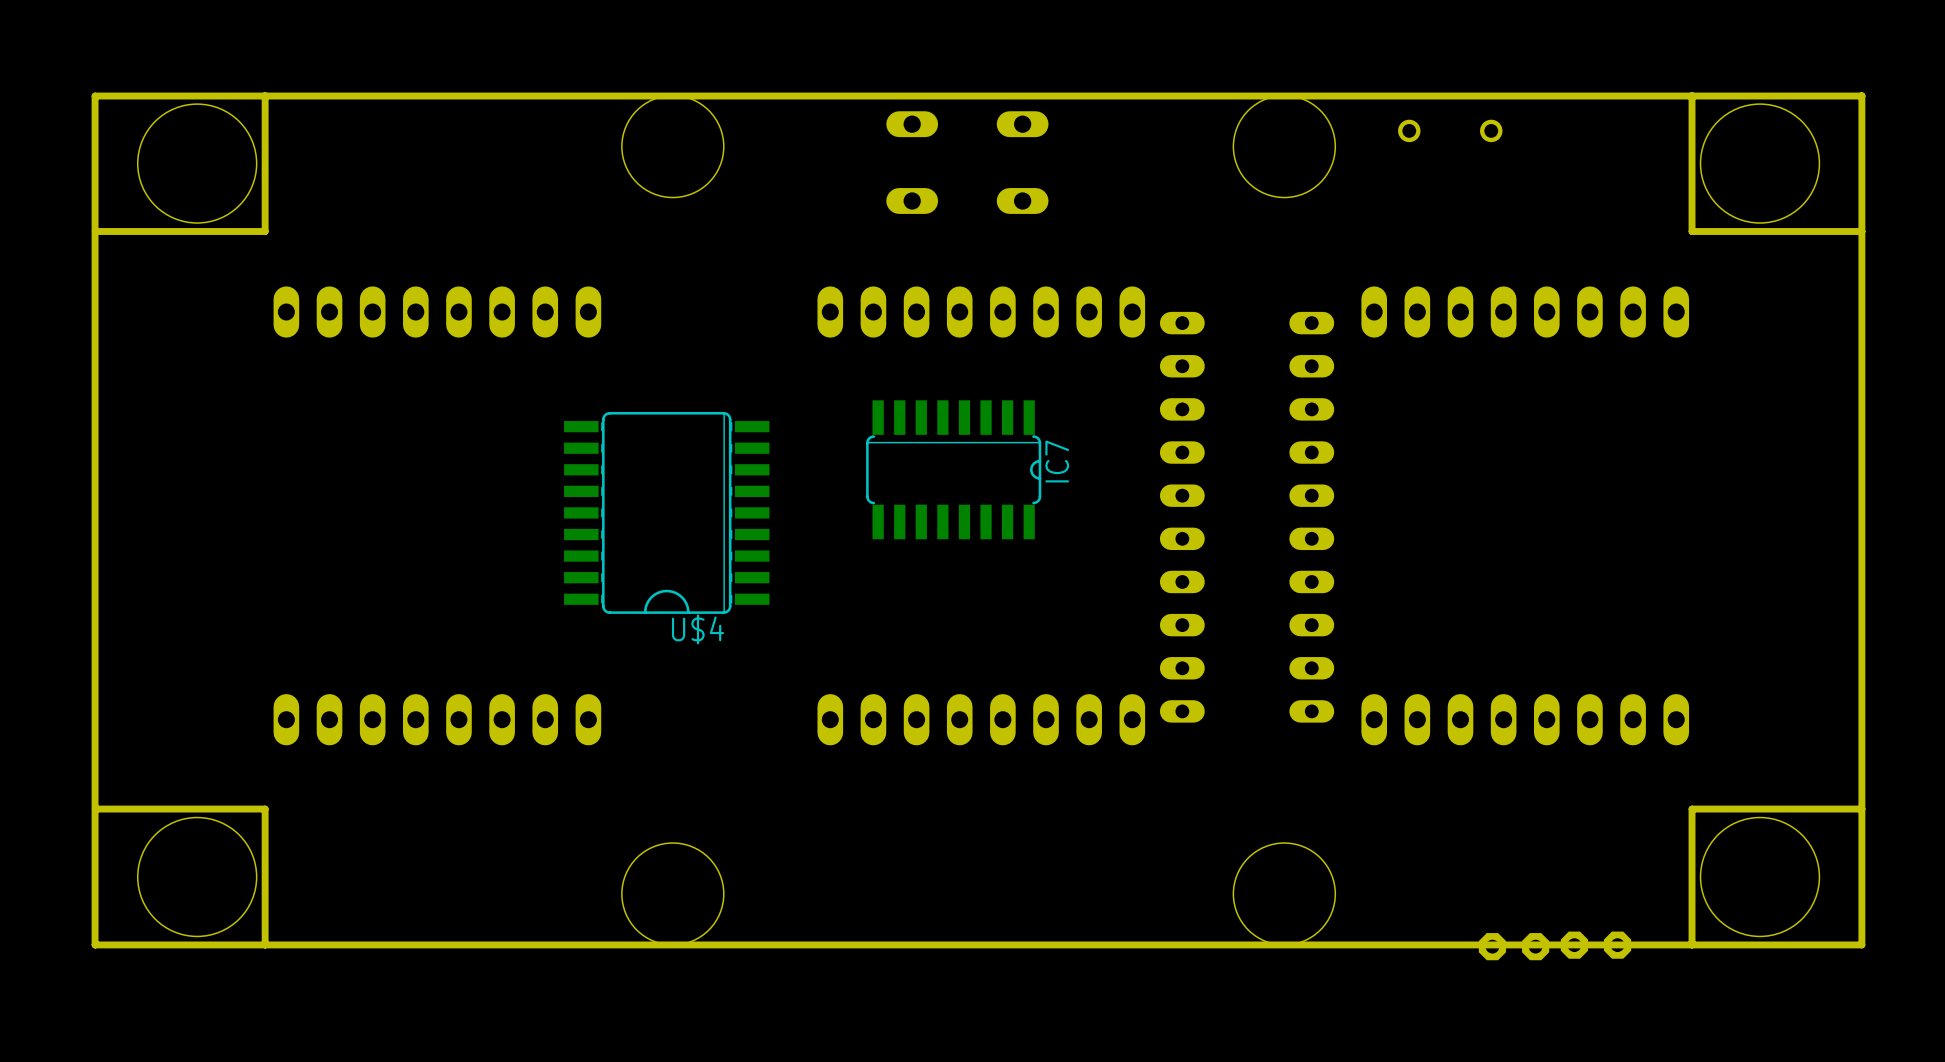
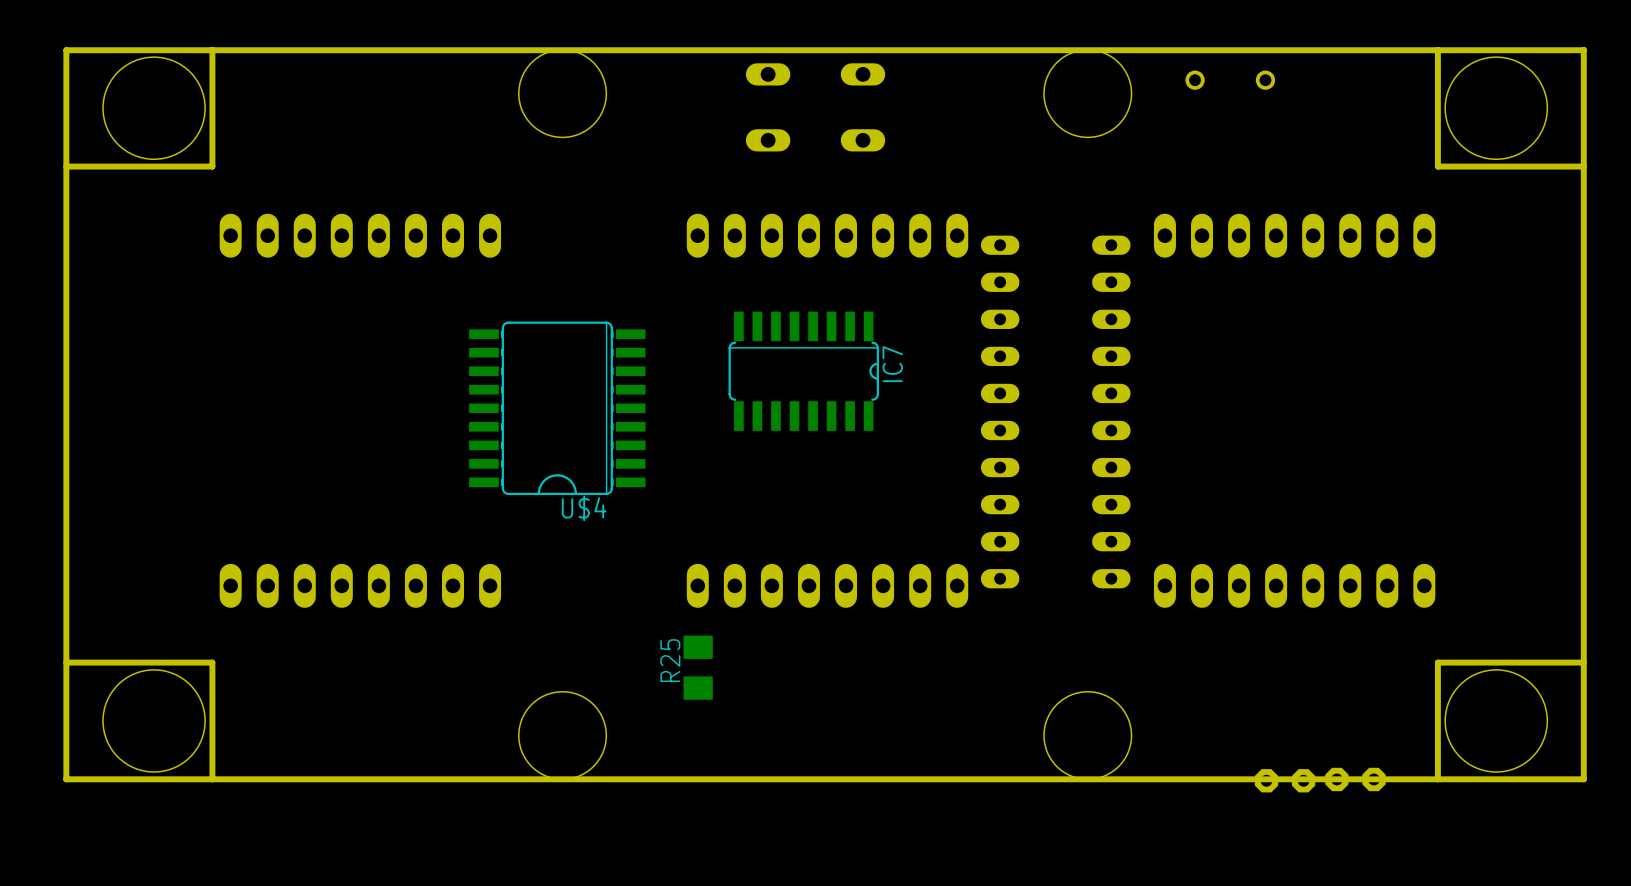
R25: none -> (698, 667)

